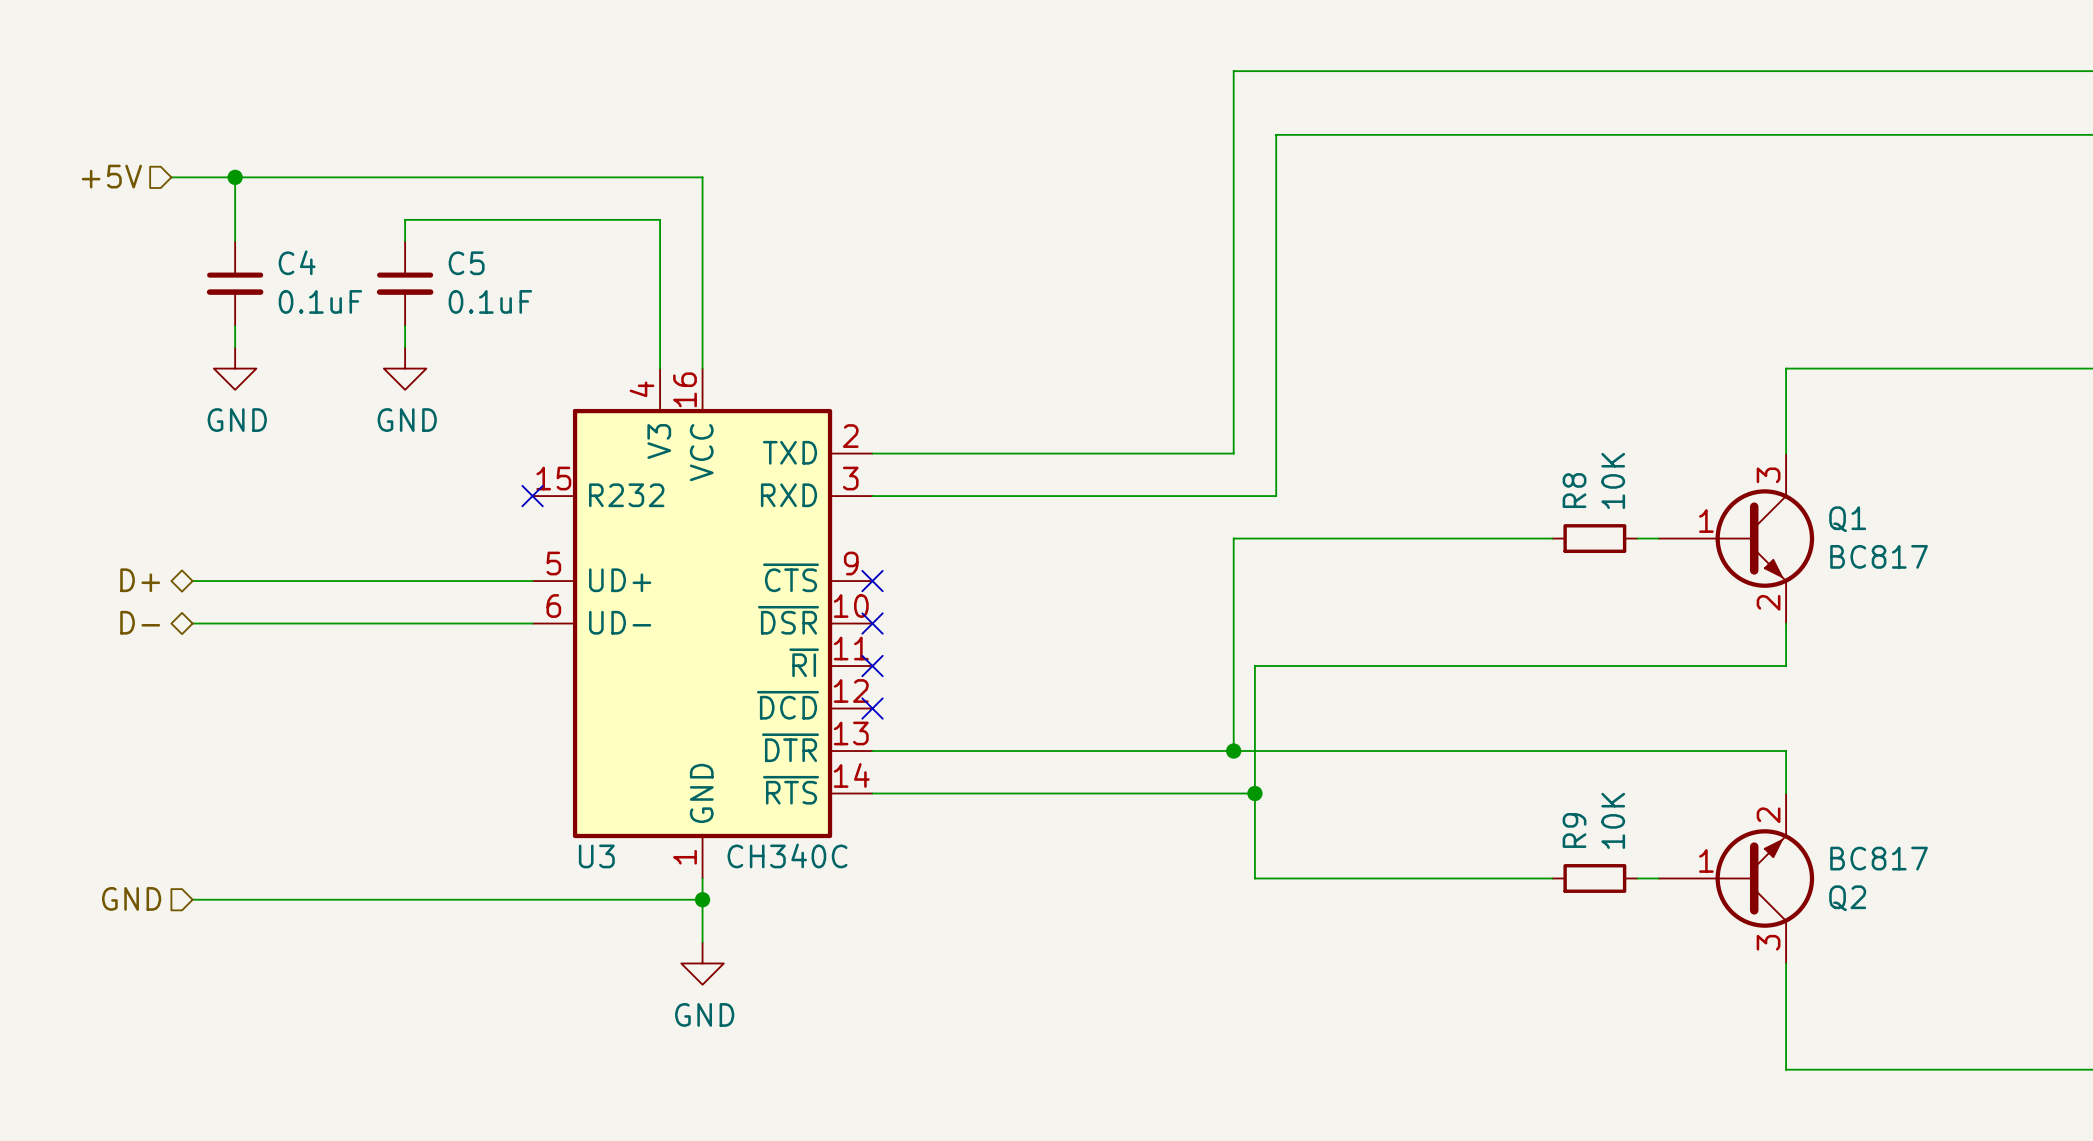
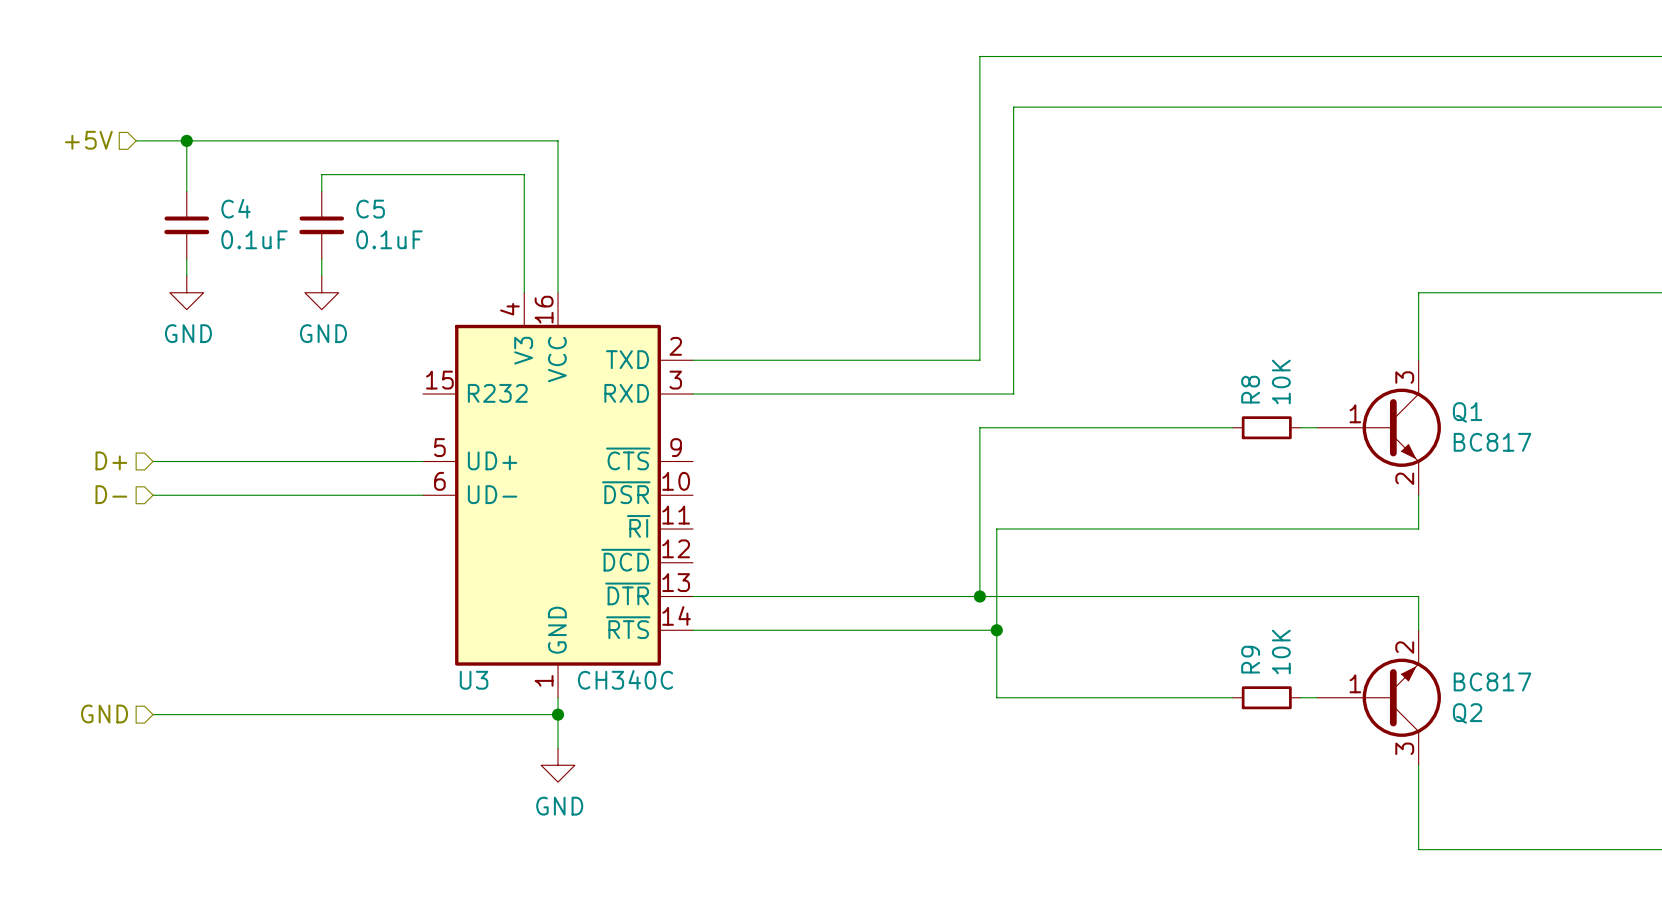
no-connect mark: (532, 496) -> none
hierarchical label shape: bidirectional (140, 580) -> input (111, 460)
no-connect mark: (872, 581) -> none
hierarchical label shape: bidirectional (140, 622) -> input (111, 494)
no-connect mark: (872, 623) -> none
no-connect mark: (872, 666) -> none
no-connect mark: (872, 708) -> none

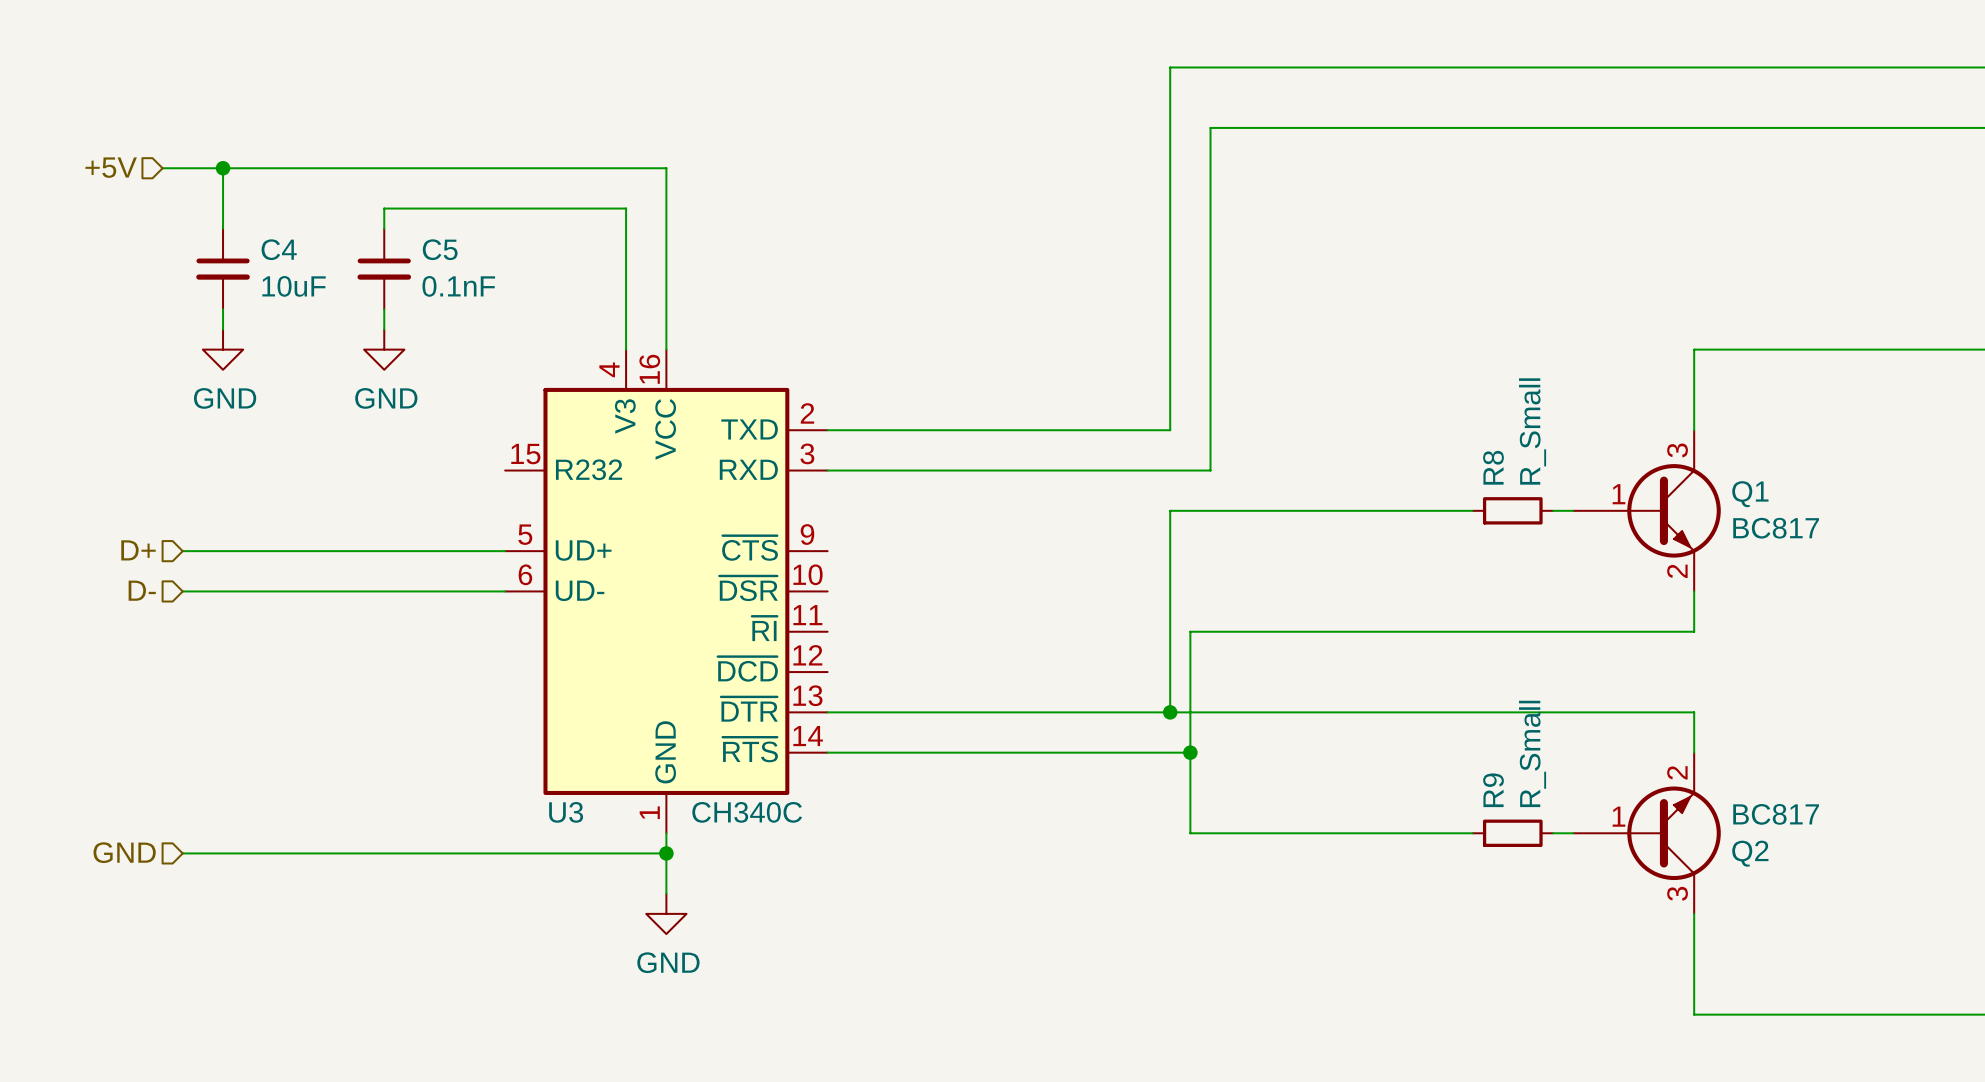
C4 value: 0.1uF (254, 239) -> 10uF (294, 286)
C5 value: 0.1uF (389, 239) -> 0.1nF (458, 286)
R8 value: 10K (1281, 382) -> R_Small (1532, 431)
R9 value: 10K (1281, 652) -> R_Small (1532, 753)

